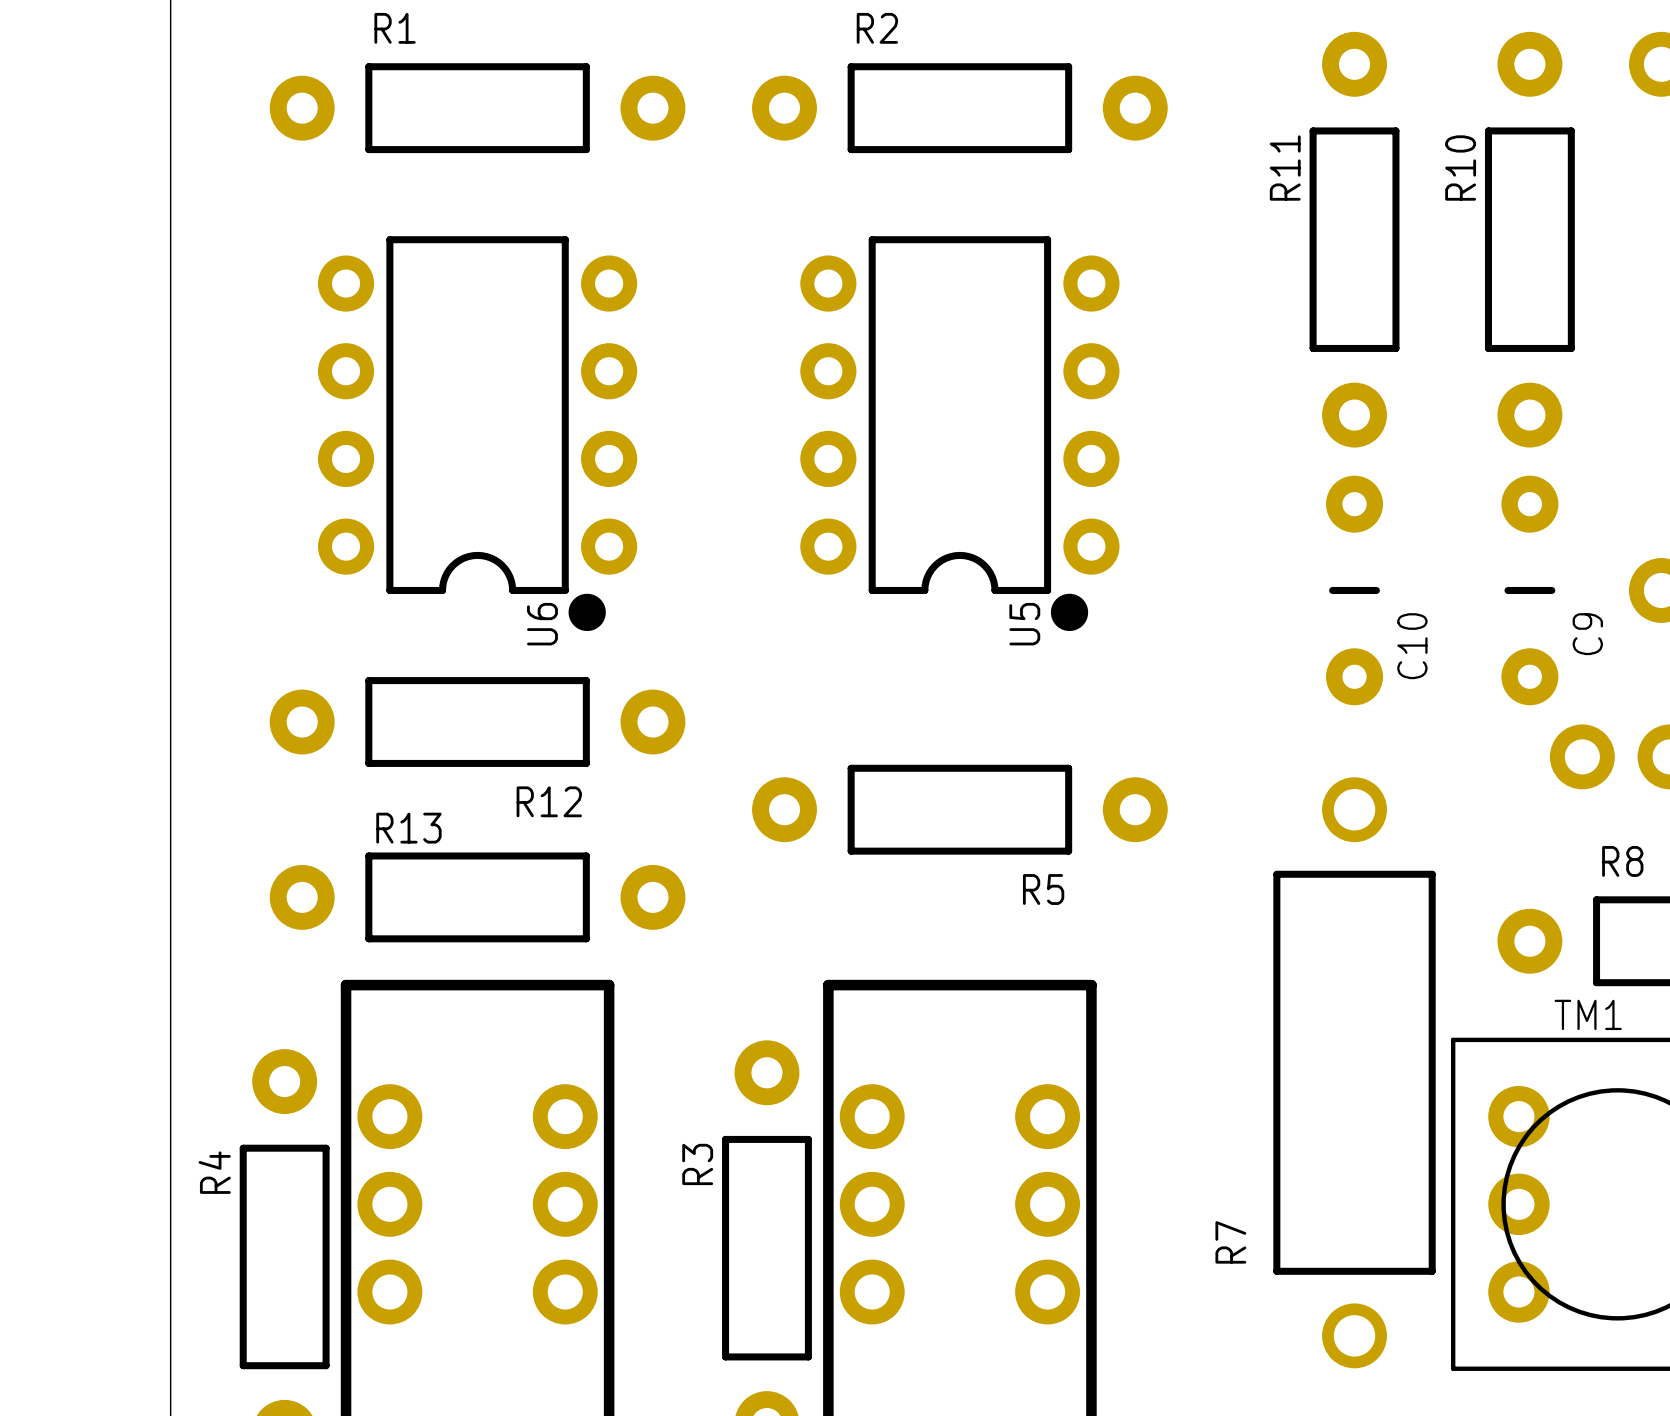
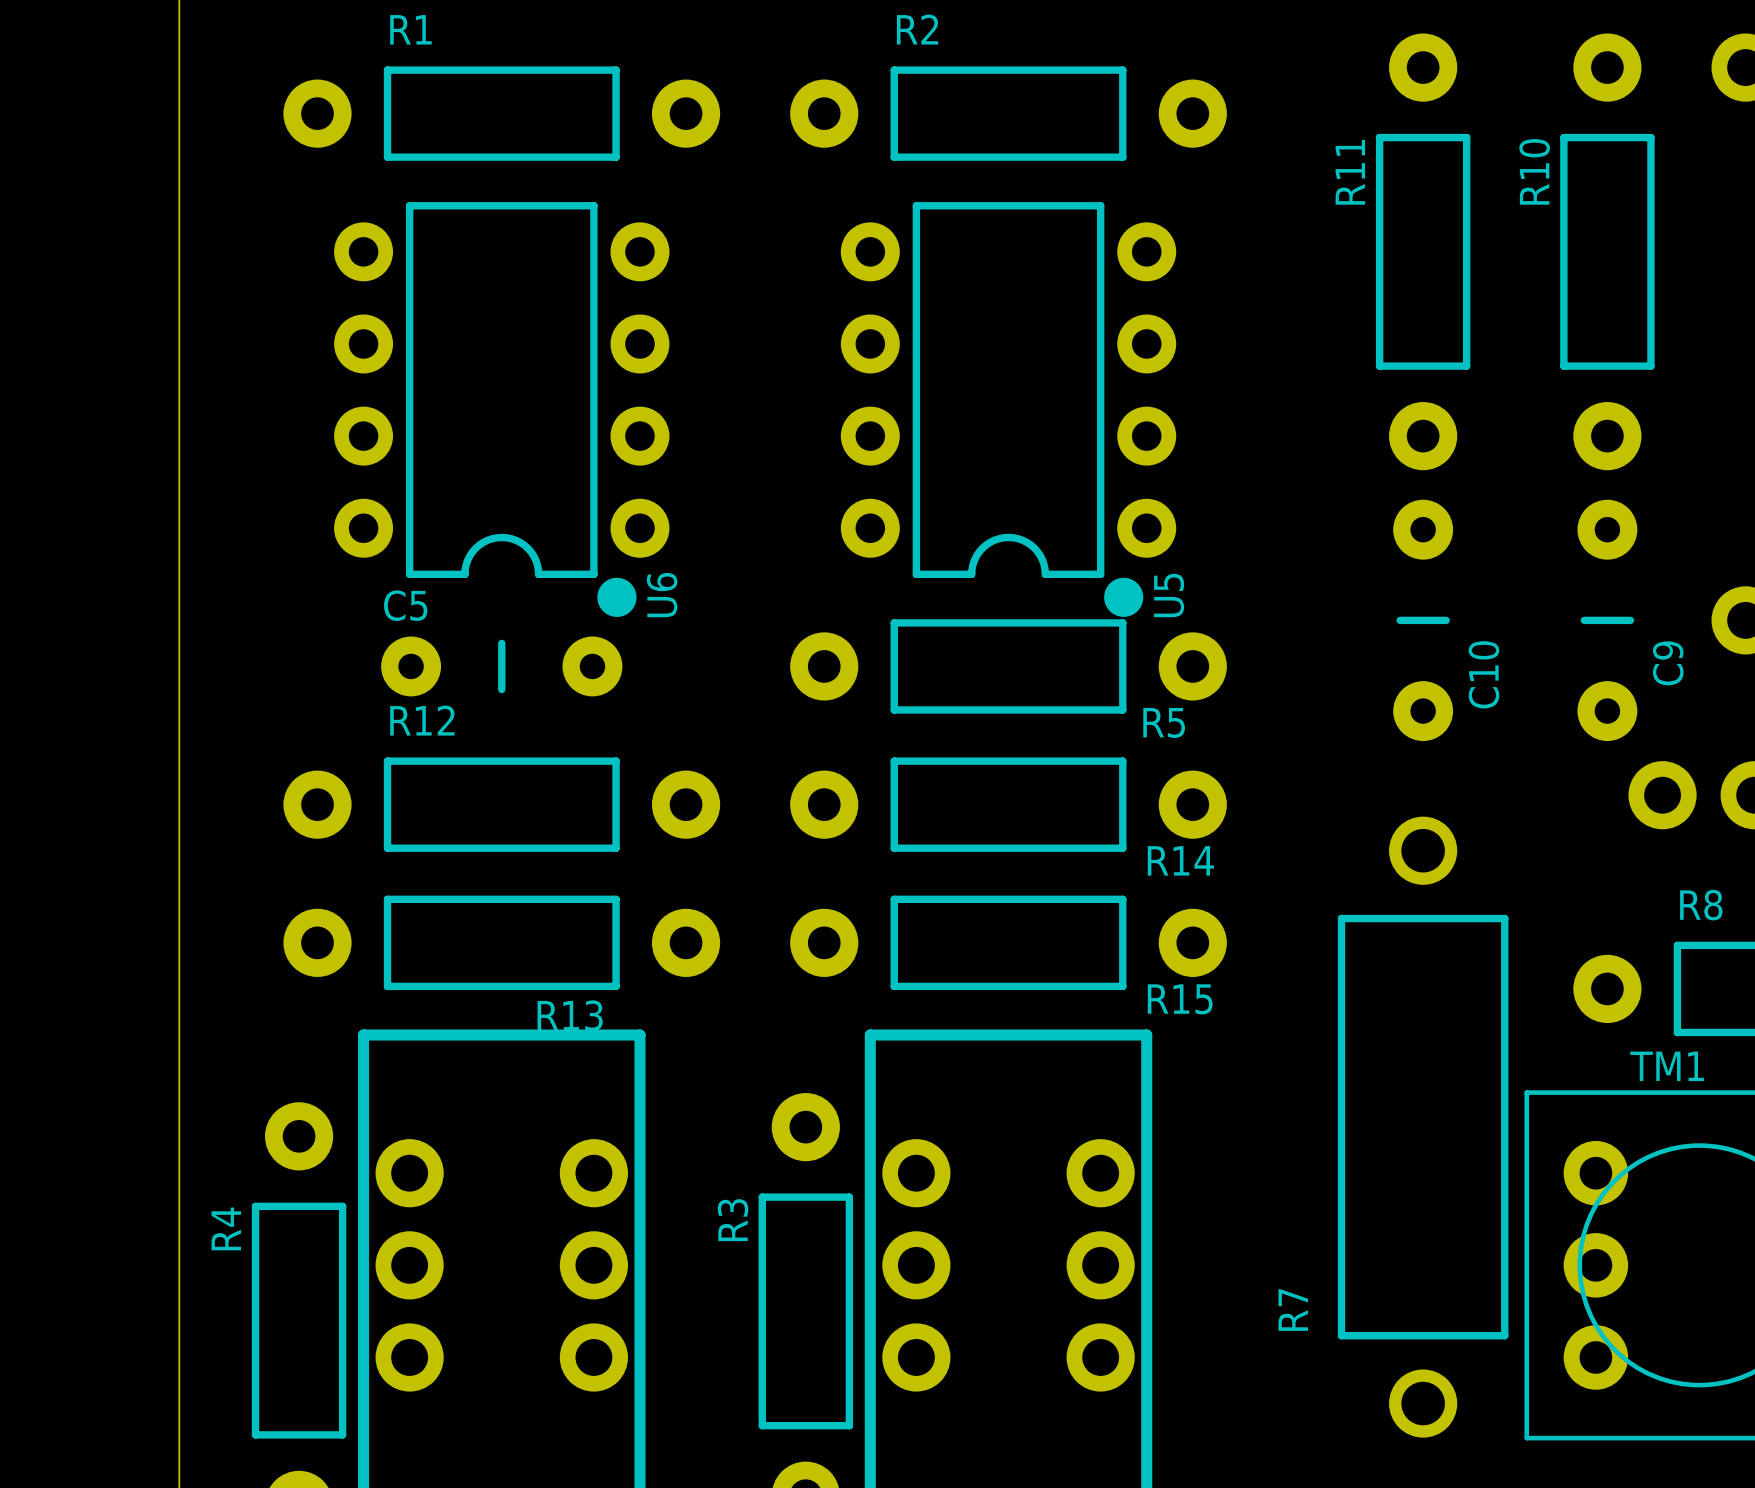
U6 position: (477, 433) -> (501, 409)
U5 position: (959, 433) -> (1008, 409)
U6 name position: U6 (542, 624) -> U6 (662, 595)
U5 name position: U5 (1024, 624) -> U5 (1169, 595)
C5: none -> (501, 666)
R12 position: (477, 722) -> (501, 804)
R14: none -> (1008, 804)
R12 name position: R12 (549, 801) -> R12 (422, 720)
R5 position: (959, 809) -> (1008, 666)
R13 name position: R13 (408, 828) -> R13 (570, 1015)
R5 name position: R5 (1043, 889) -> R5 (1164, 722)
R15: none -> (1008, 942)

